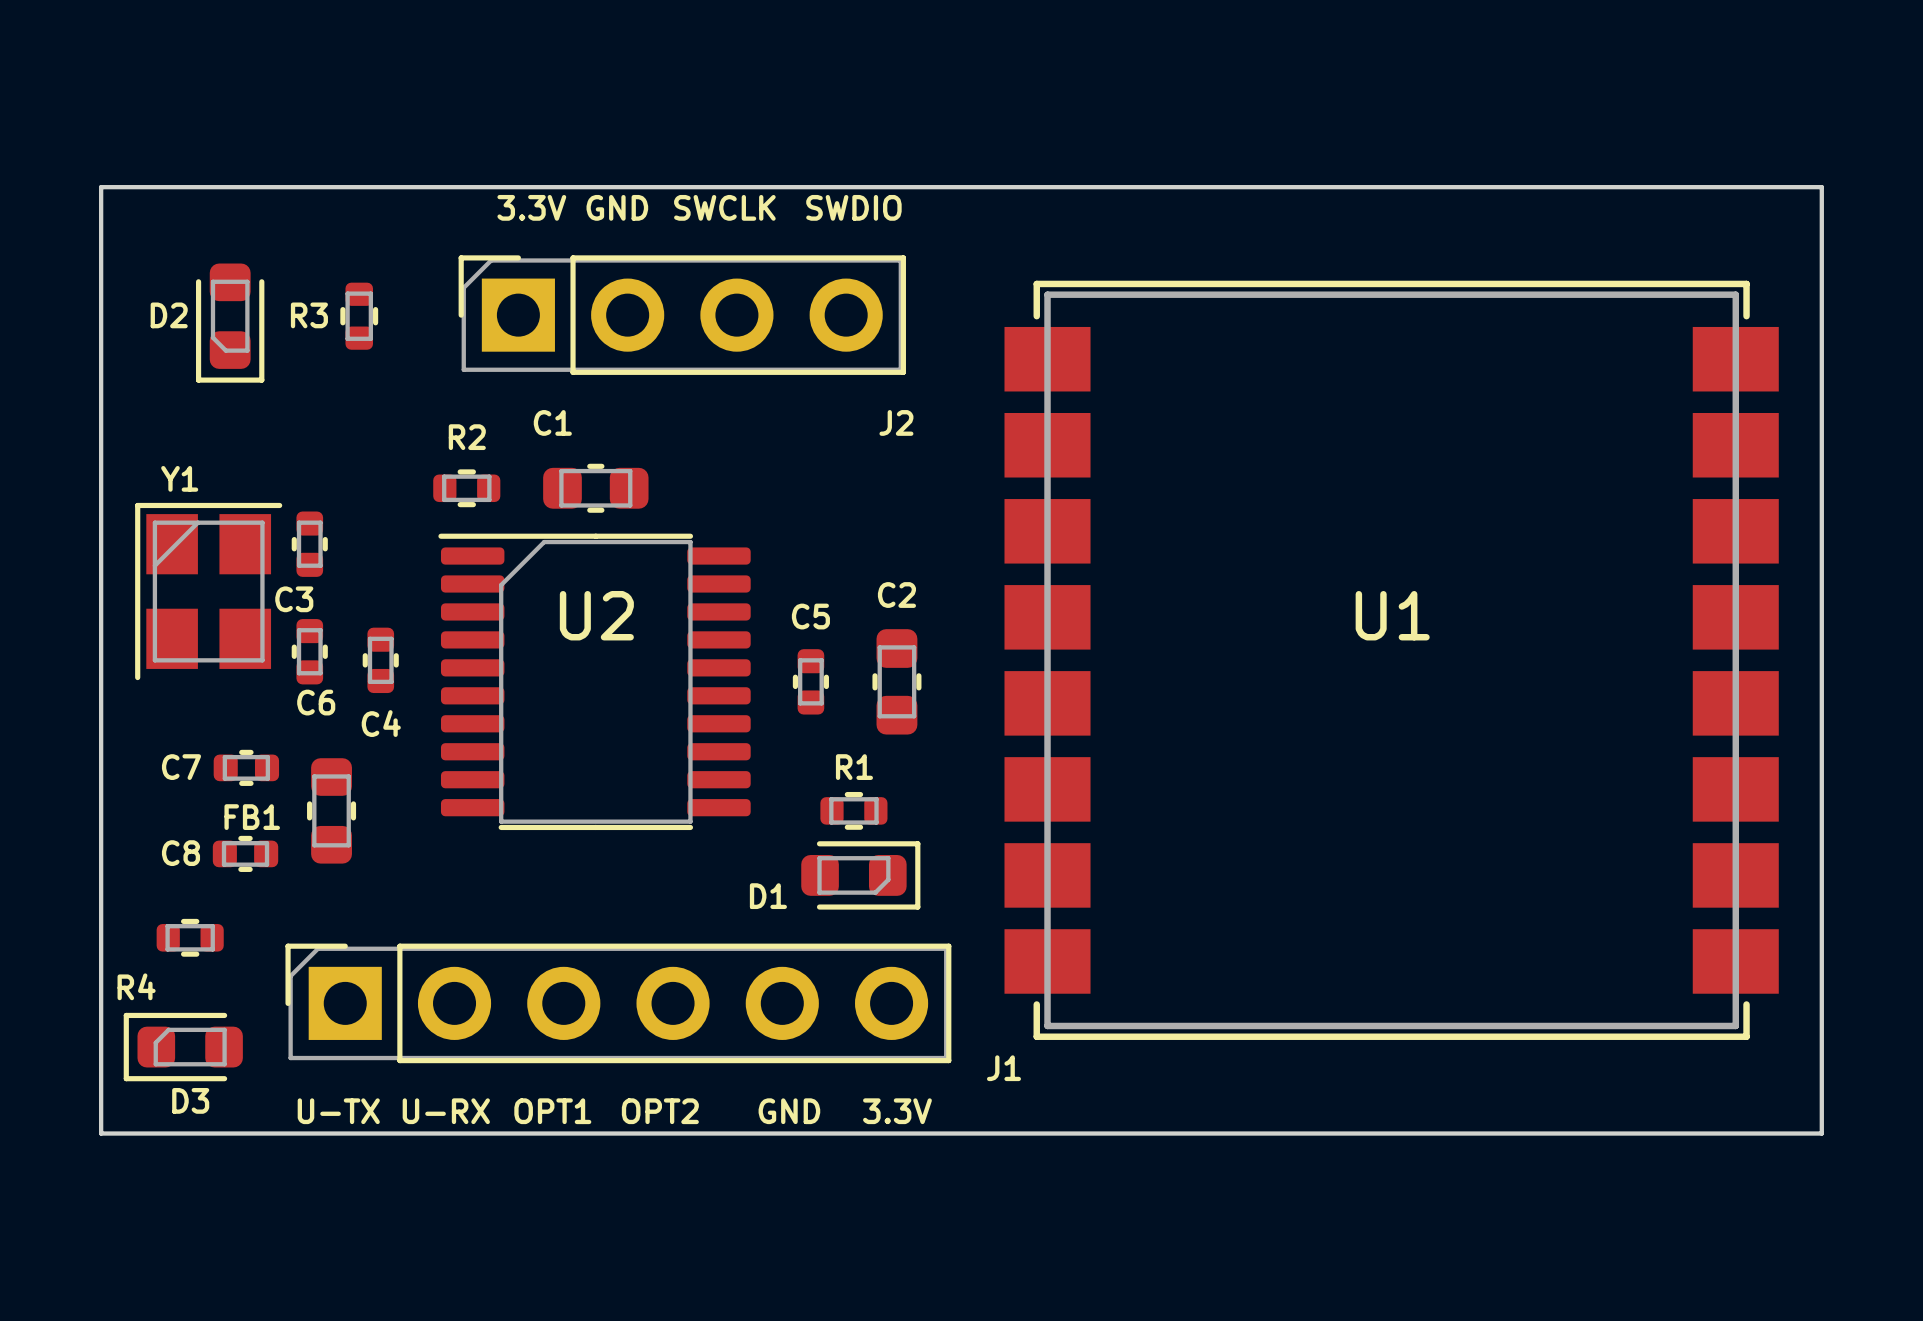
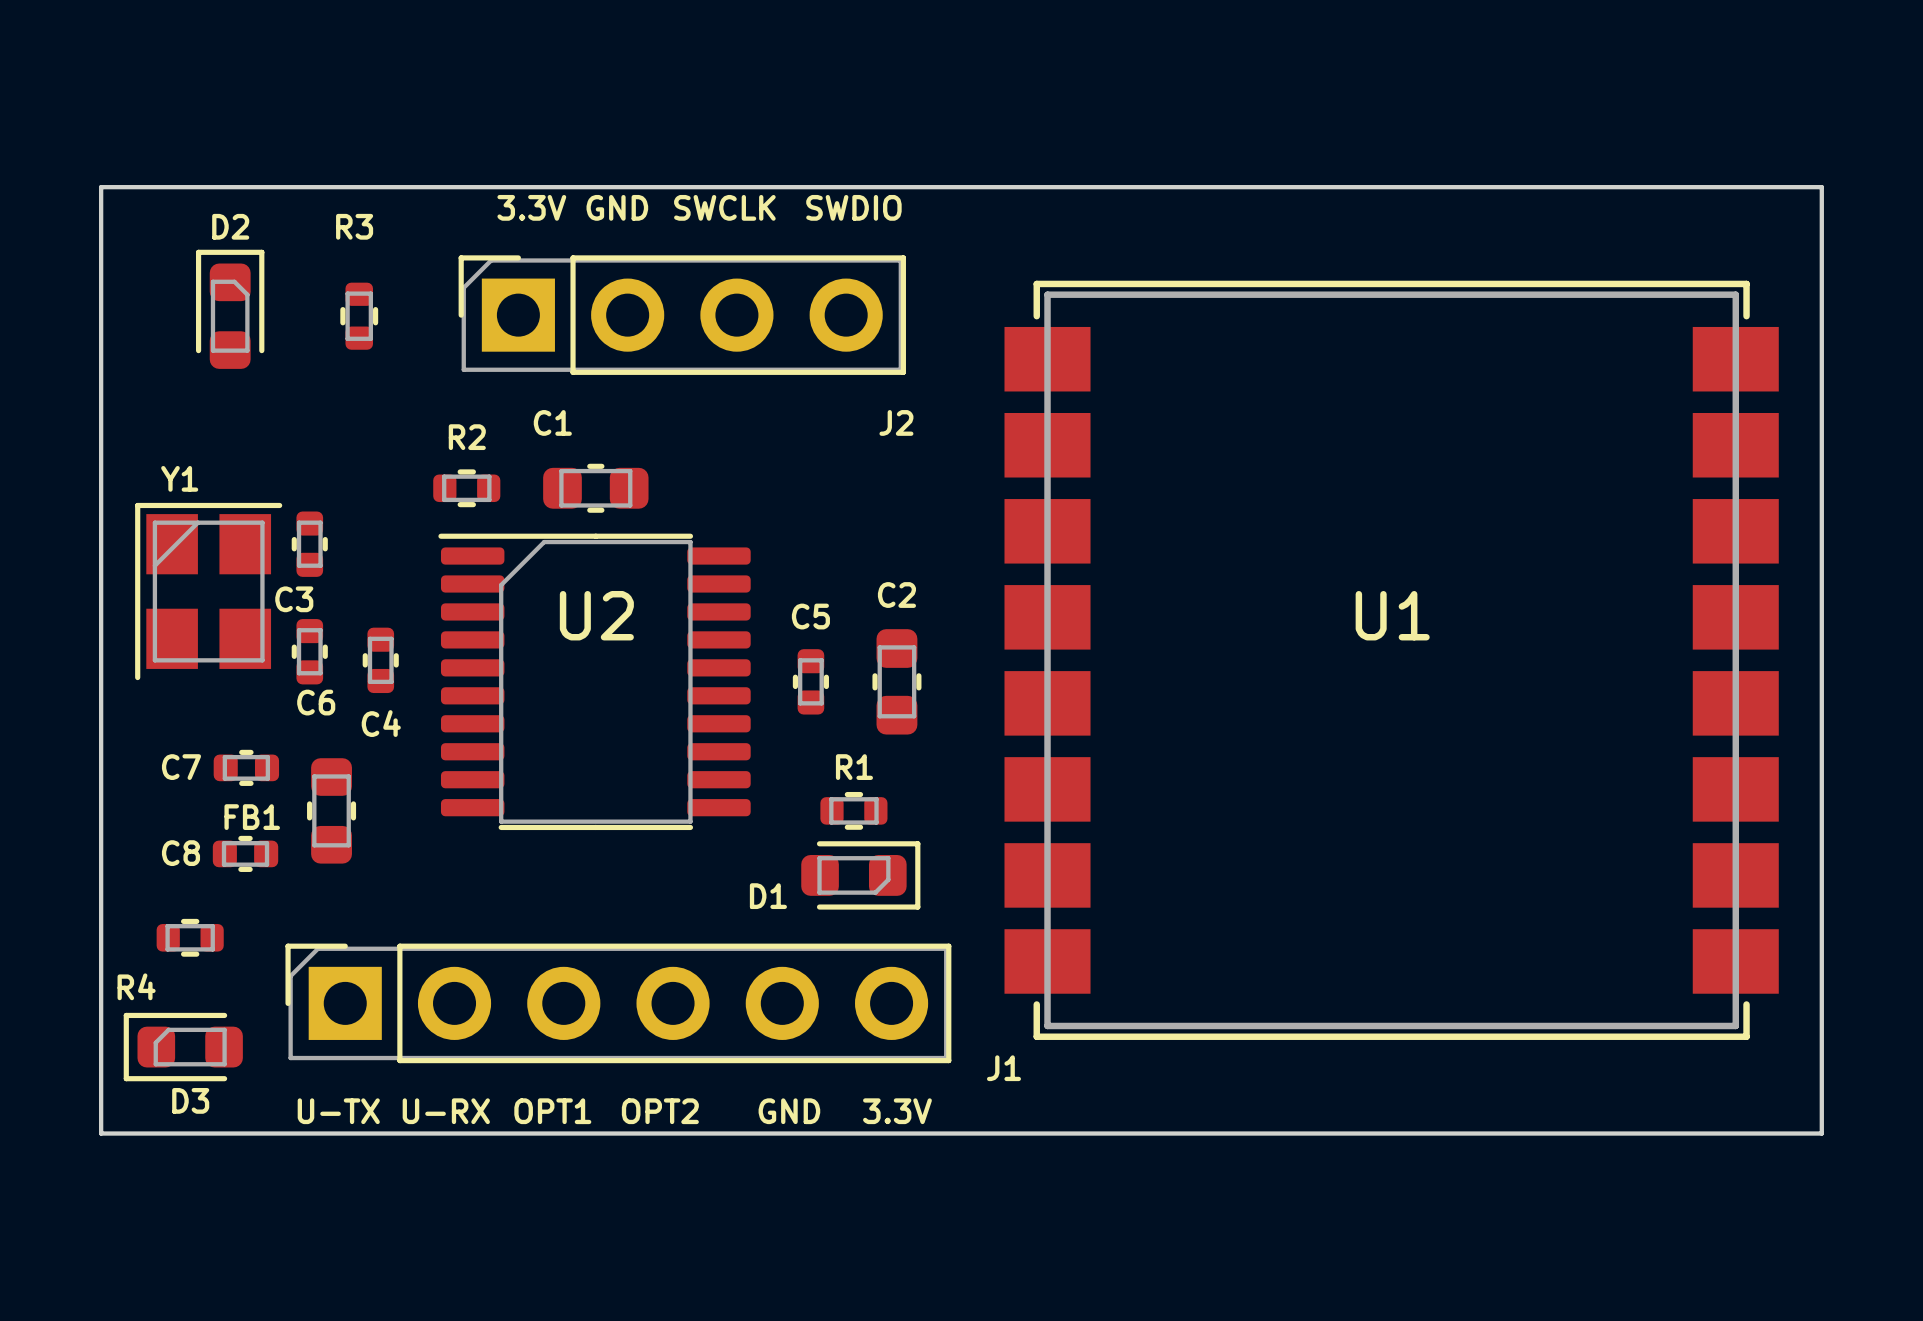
D2 name position: D2 (169, 315) -> D2 (230, 226)
R3 name position: R3 (309, 315) -> R3 (354, 226)
D2 rotation: 0° (230, 323) -> 180° (230, 309)

